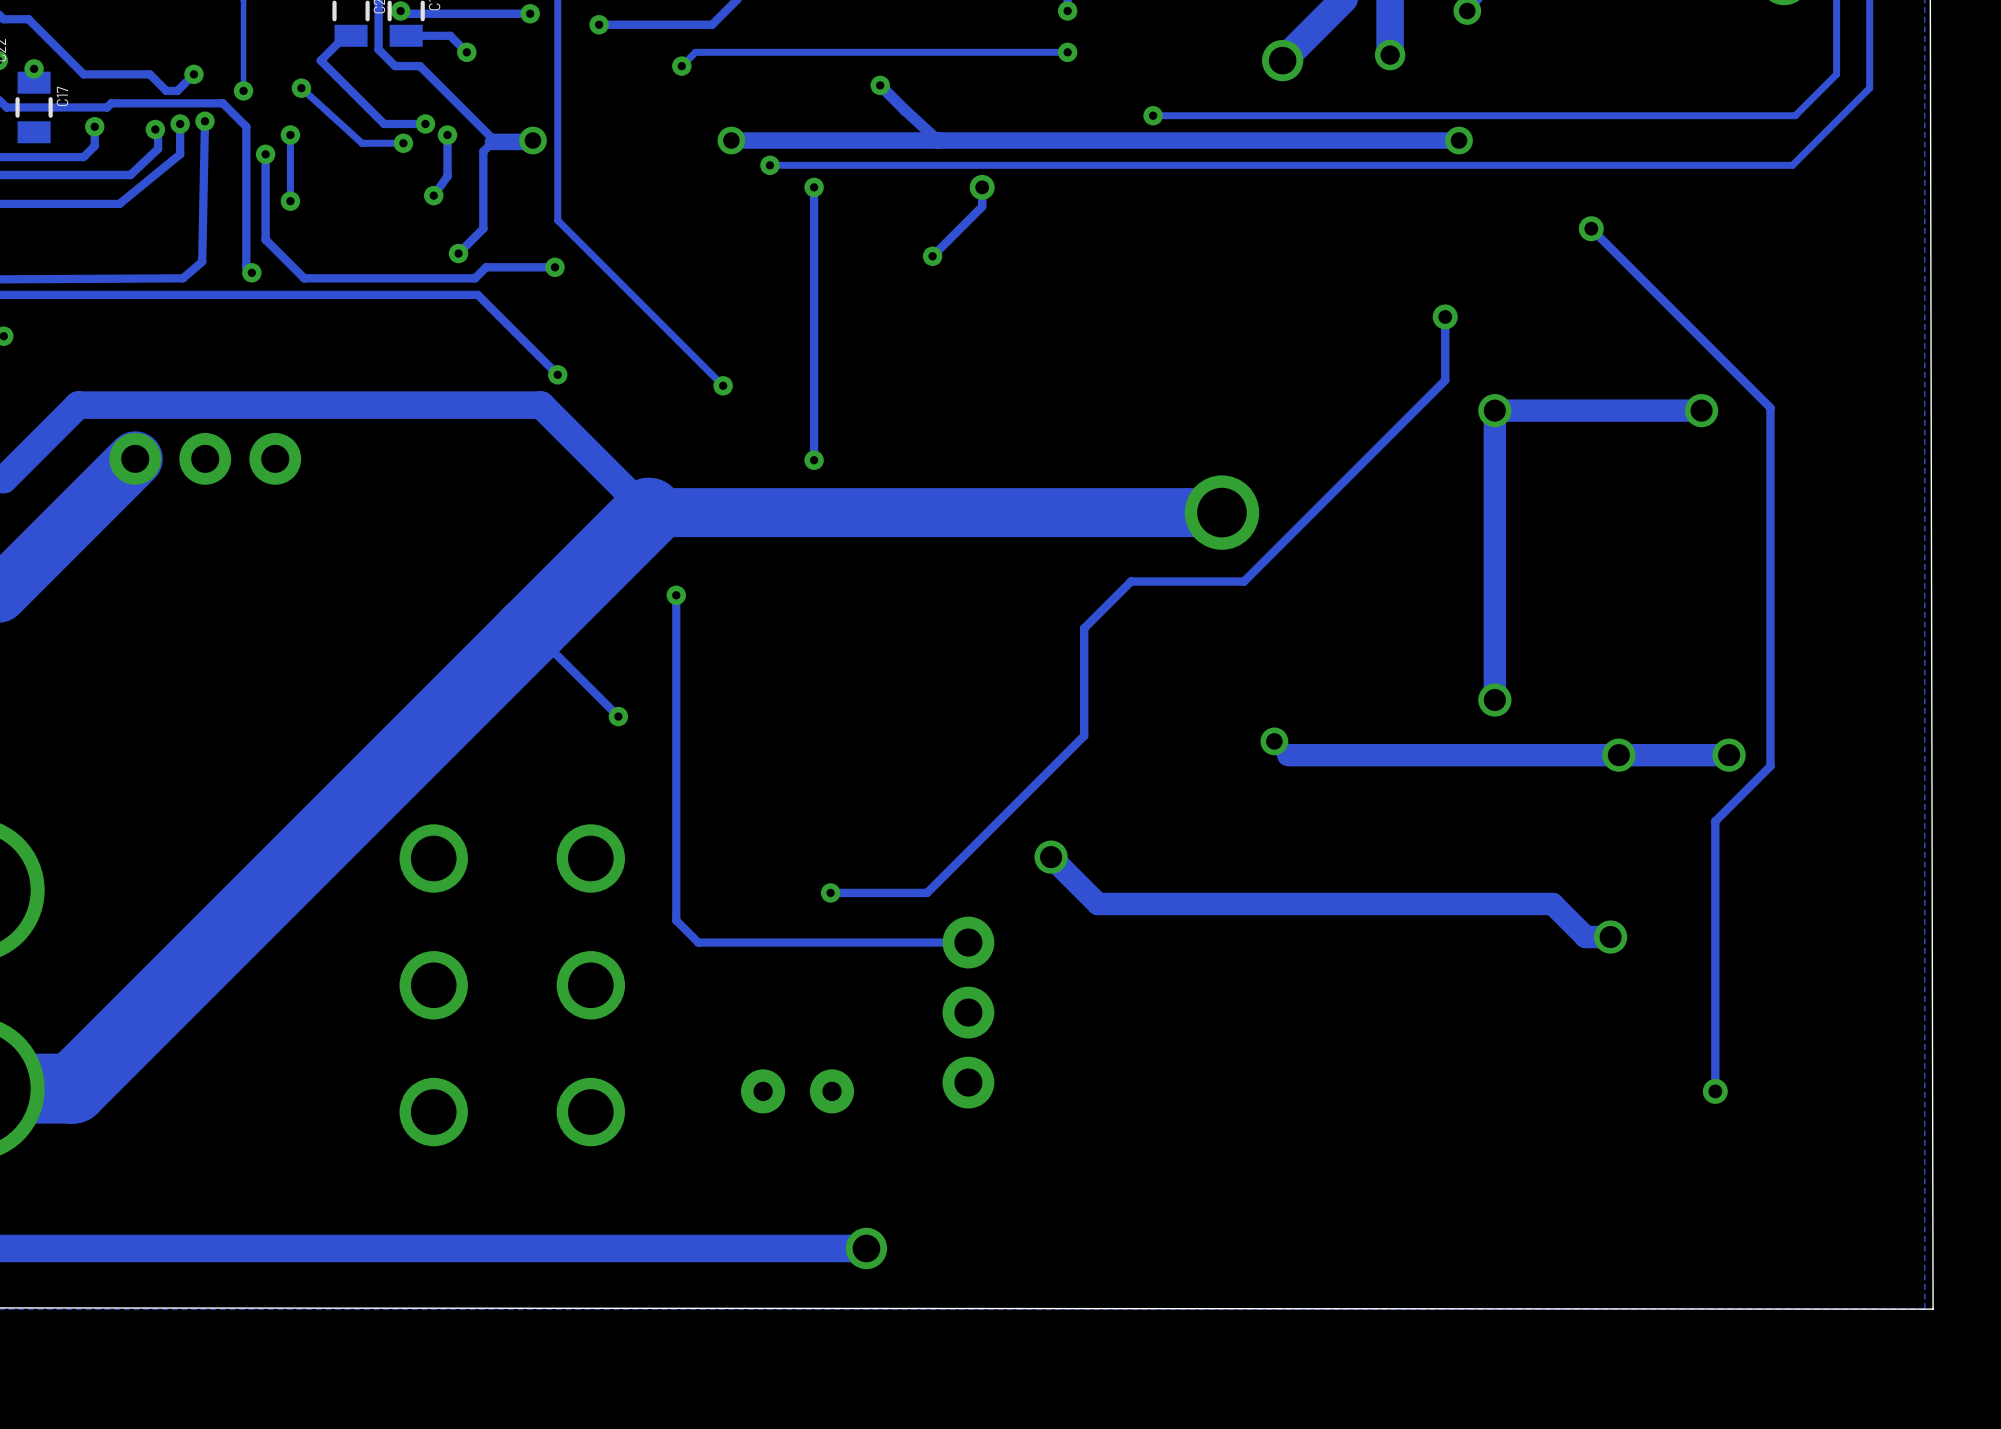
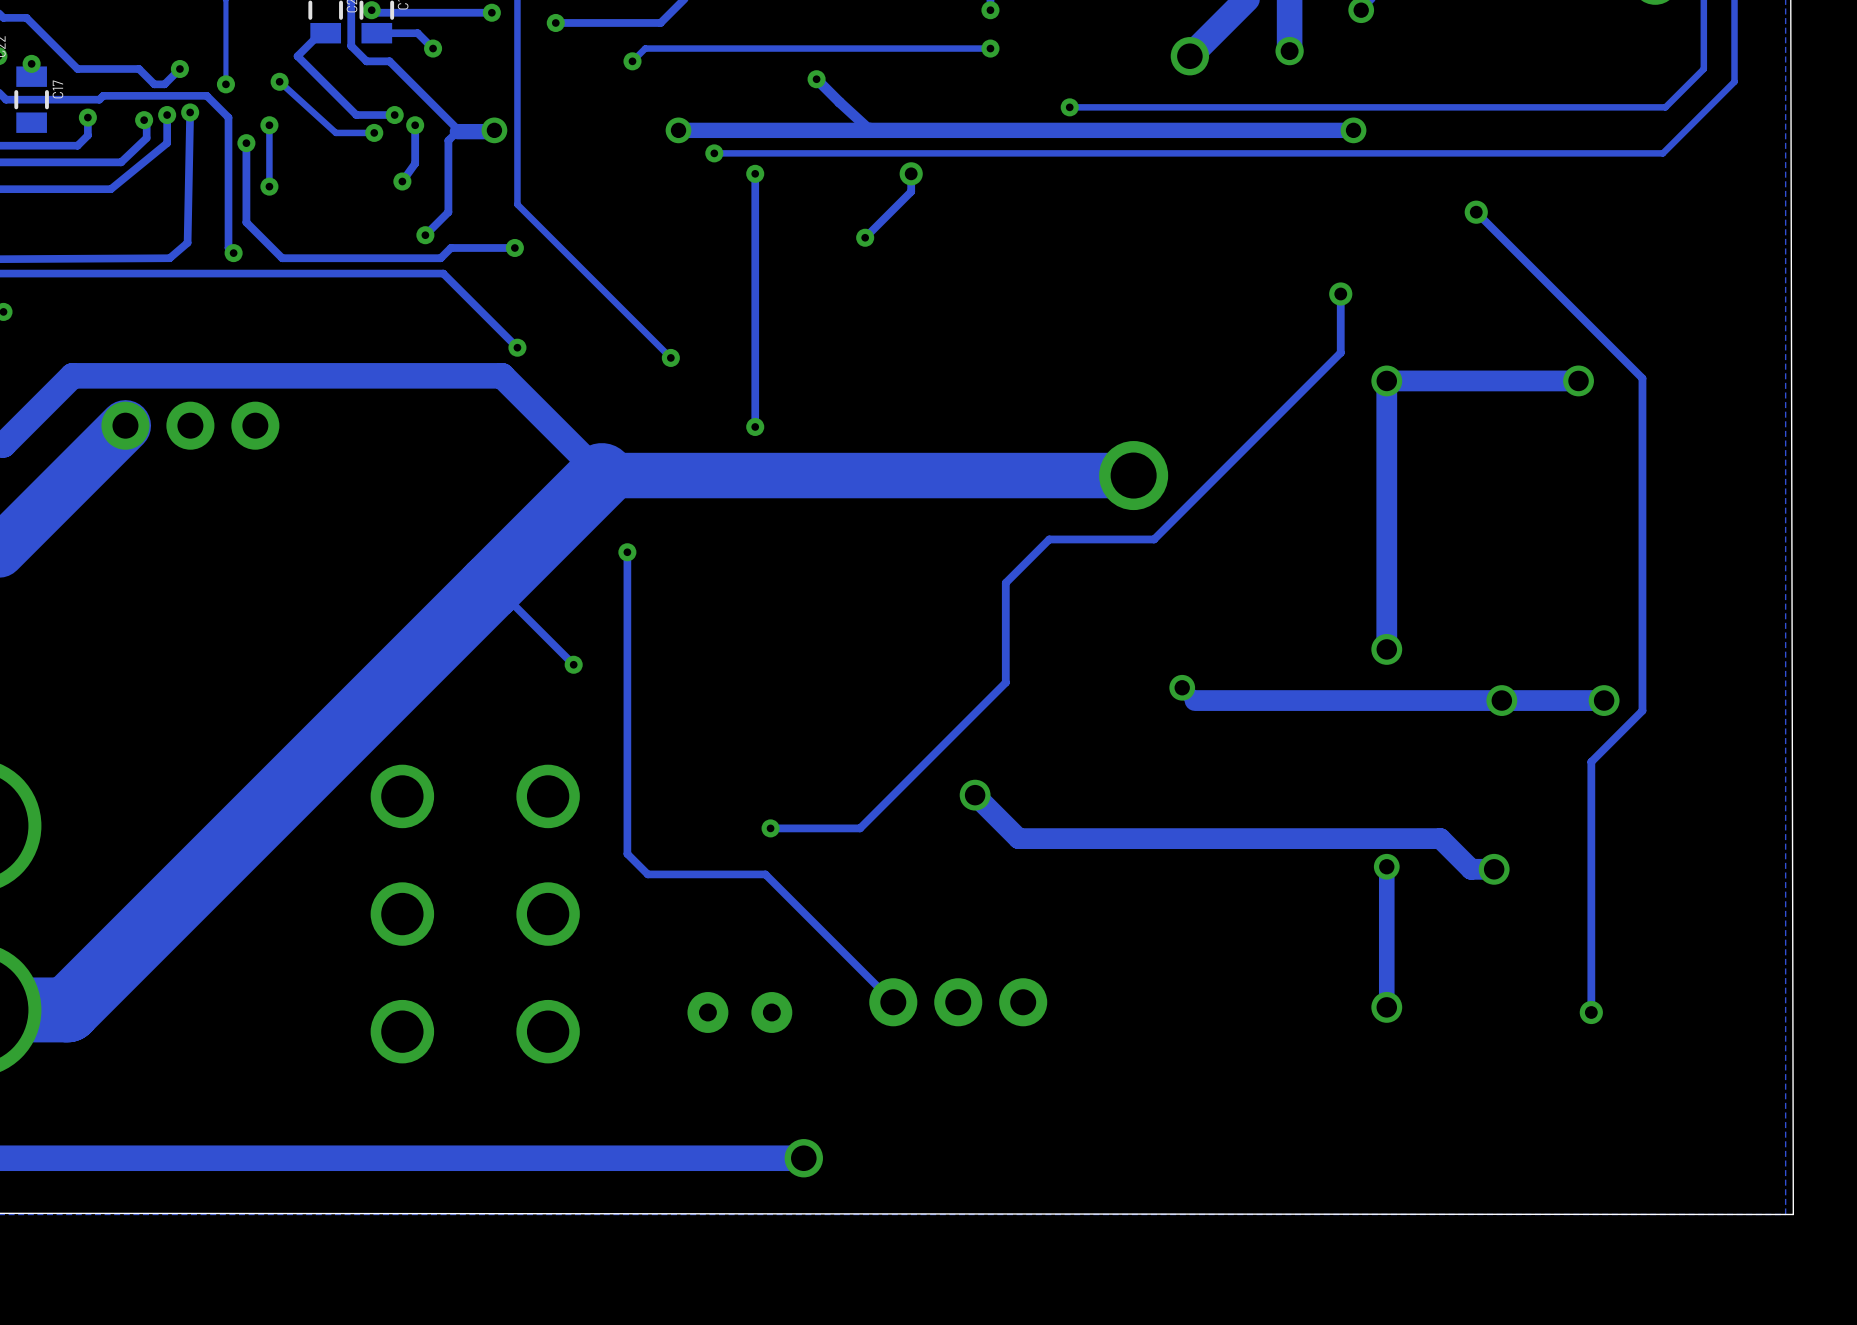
track: none -> (1386, 866) (1386, 1007)
via: none -> (1386, 866)
track: (968, 942) (825, 942) -> (893, 1002) (765, 874)
part rotation: 0° (968, 1012) -> 90° clockwise (958, 1002)
via: none -> (1386, 1007)

